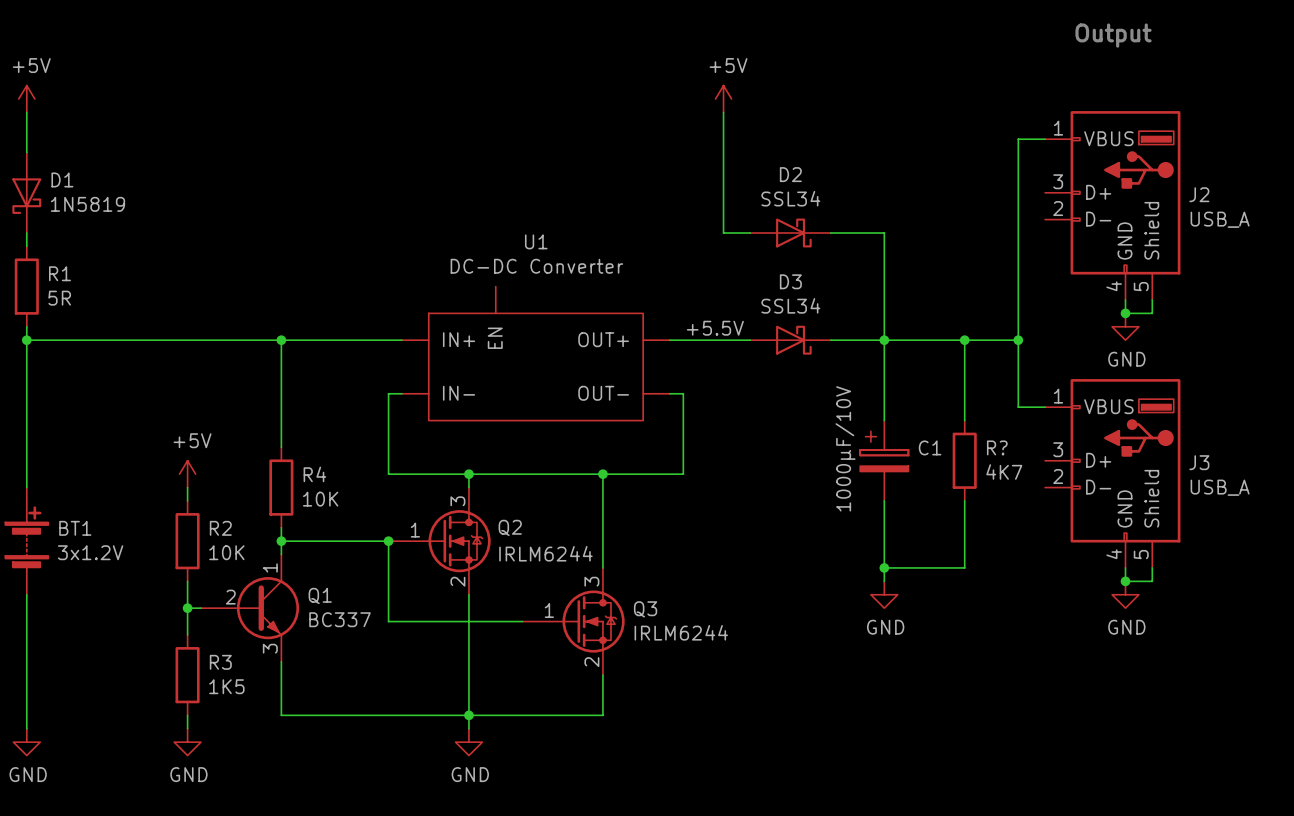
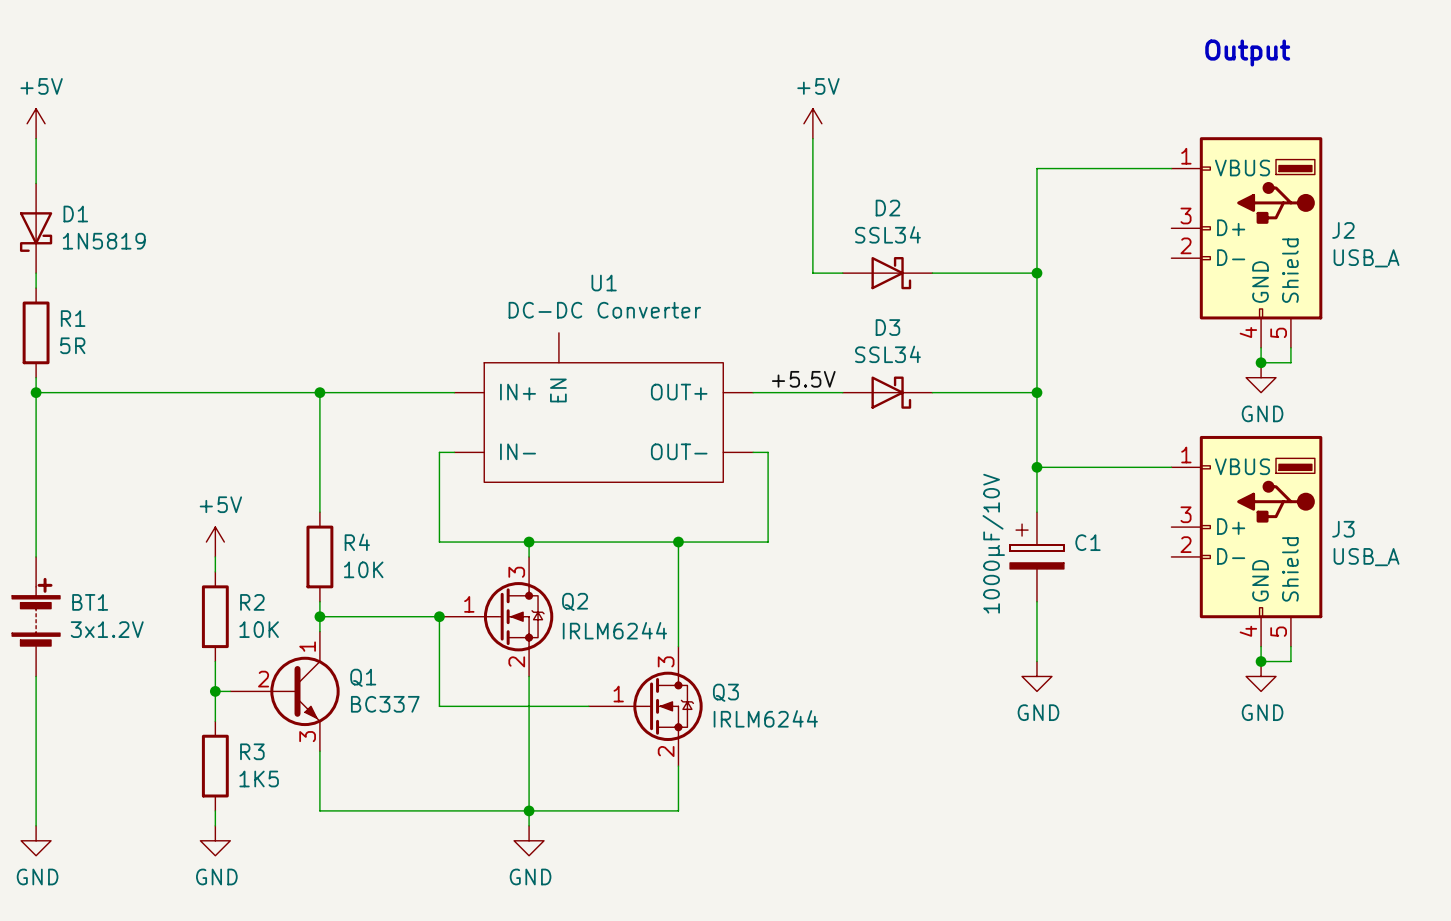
wire: (1018, 139) (1018, 407) -> (1141, 168) (1036, 168) (1036, 512)
wire: (884, 232) (884, 420) -> (992, 273) (1036, 273)
junction: none -> (1036, 273)
junction: (884, 340) -> none
wire: (924, 340) (1018, 340) -> (1036, 467) (1141, 467)
junction: none -> (1036, 392)
wire: (964, 340) (964, 420) -> none
junction: (964, 340) -> none
junction: (1018, 340) -> none
junction: none -> (1036, 467)
C1 position: (884, 460) -> (1036, 556)
R?: 4K7 (964, 460) -> none
wire: (884, 500) (884, 581) -> none
wire: (964, 500) (964, 567) (884, 567) -> none
wire: none -> (1036, 601) (1036, 661)
junction: (884, 567) -> none
power symbol position: GND (884, 594) -> GND (1036, 676)

